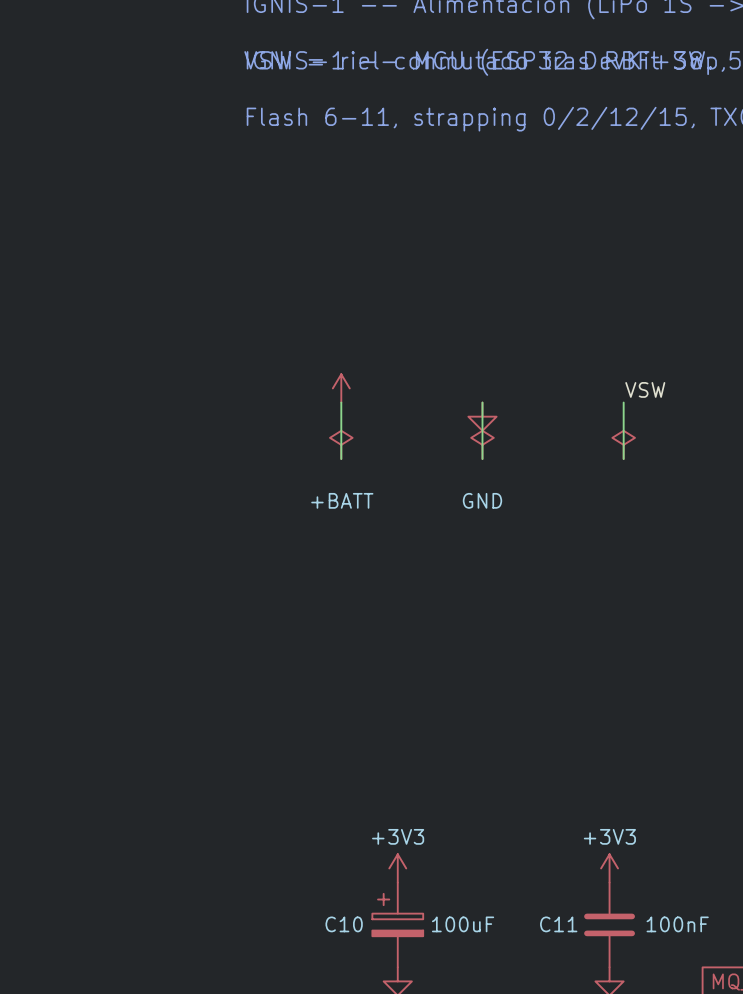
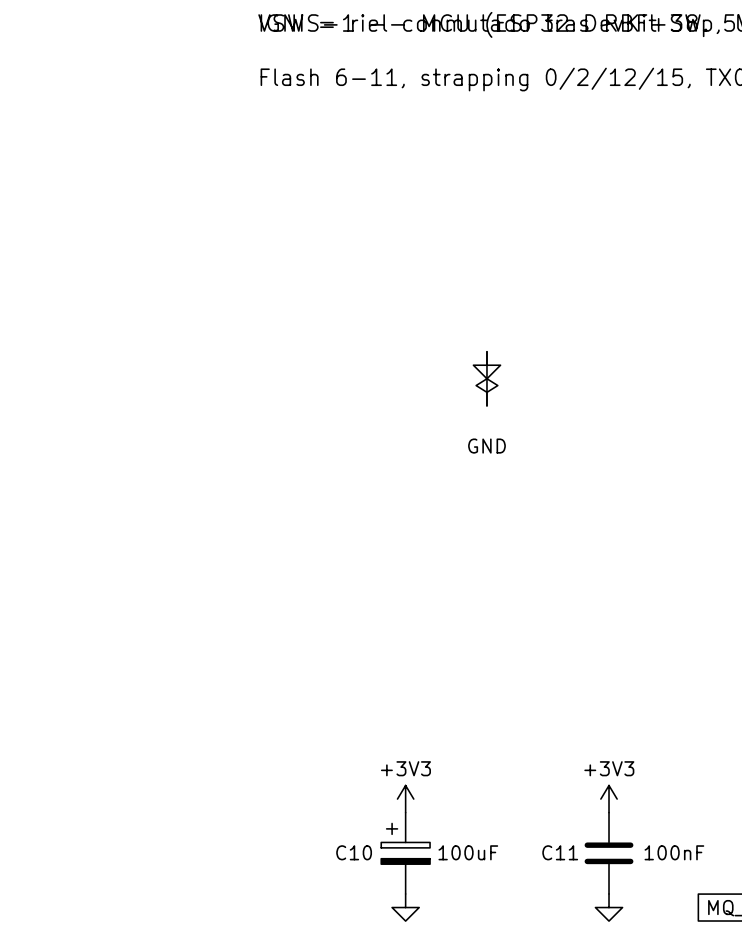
power symbol: +BATT (341, 388) -> none
label: VSW (645, 389) -> none
wire: (341, 402) (341, 459) -> none
wire: (623, 402) (623, 459) -> none
power symbol: (341, 444) -> none
power symbol: (623, 444) -> none

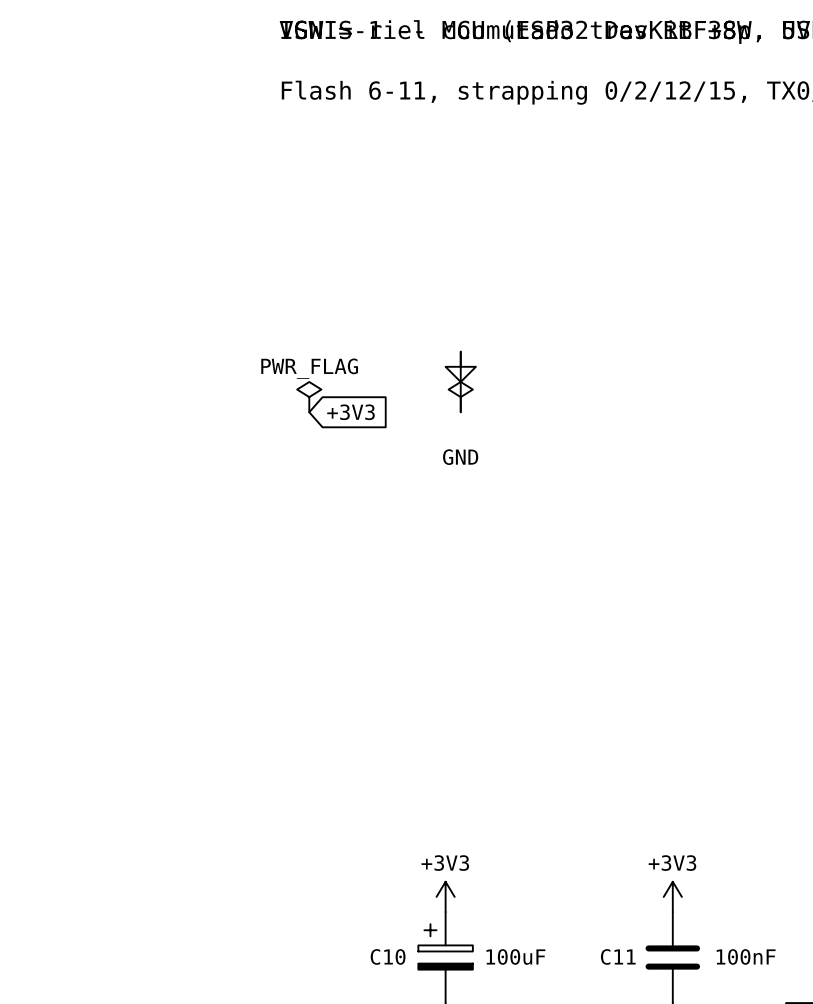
power symbol: none -> PWR_FLAG (309, 397)
wire: (486, 351) (486, 405) -> (460, 351) (460, 412)
global label: none -> +3V3 (351, 412)
power symbol position: GND (486, 365) -> GND (460, 366)
power symbol position: (486, 392) -> (460, 397)

